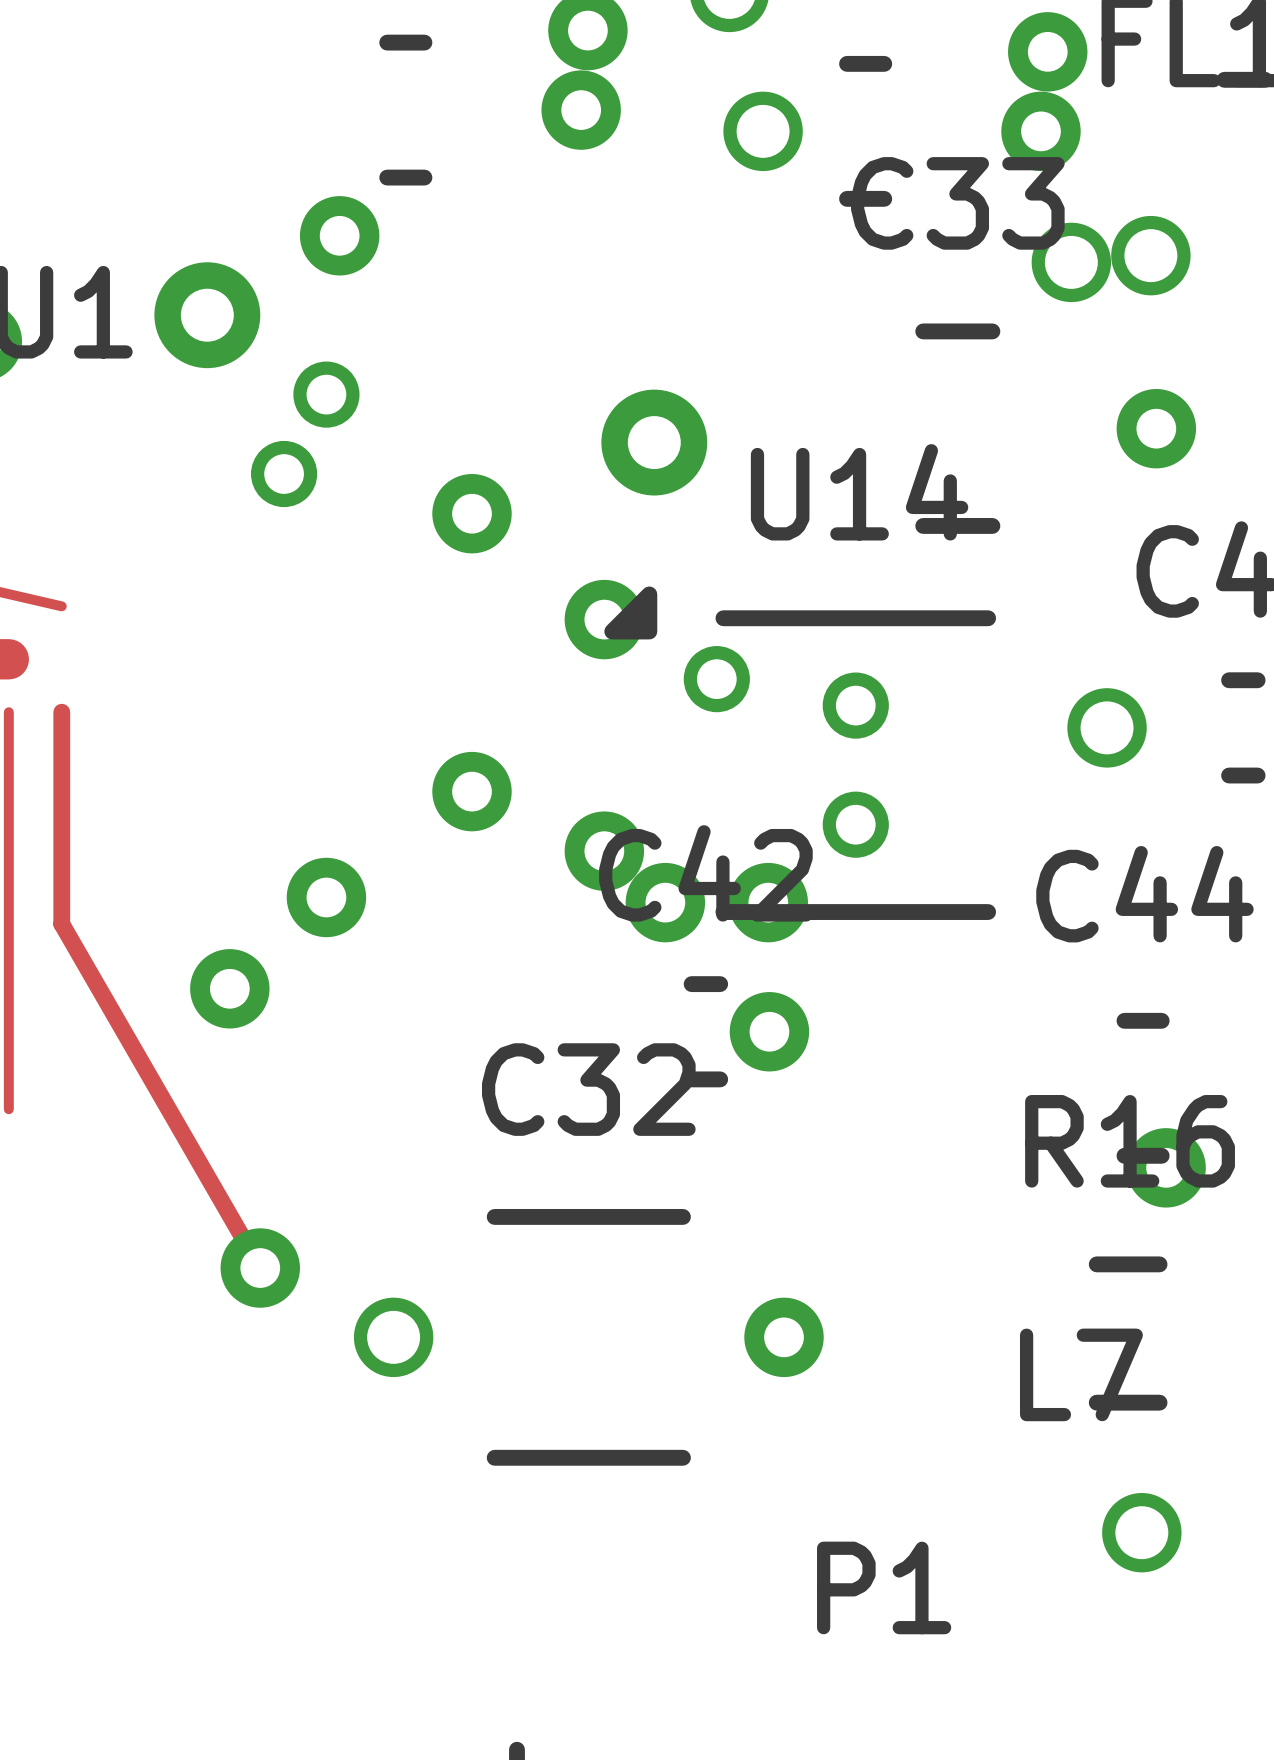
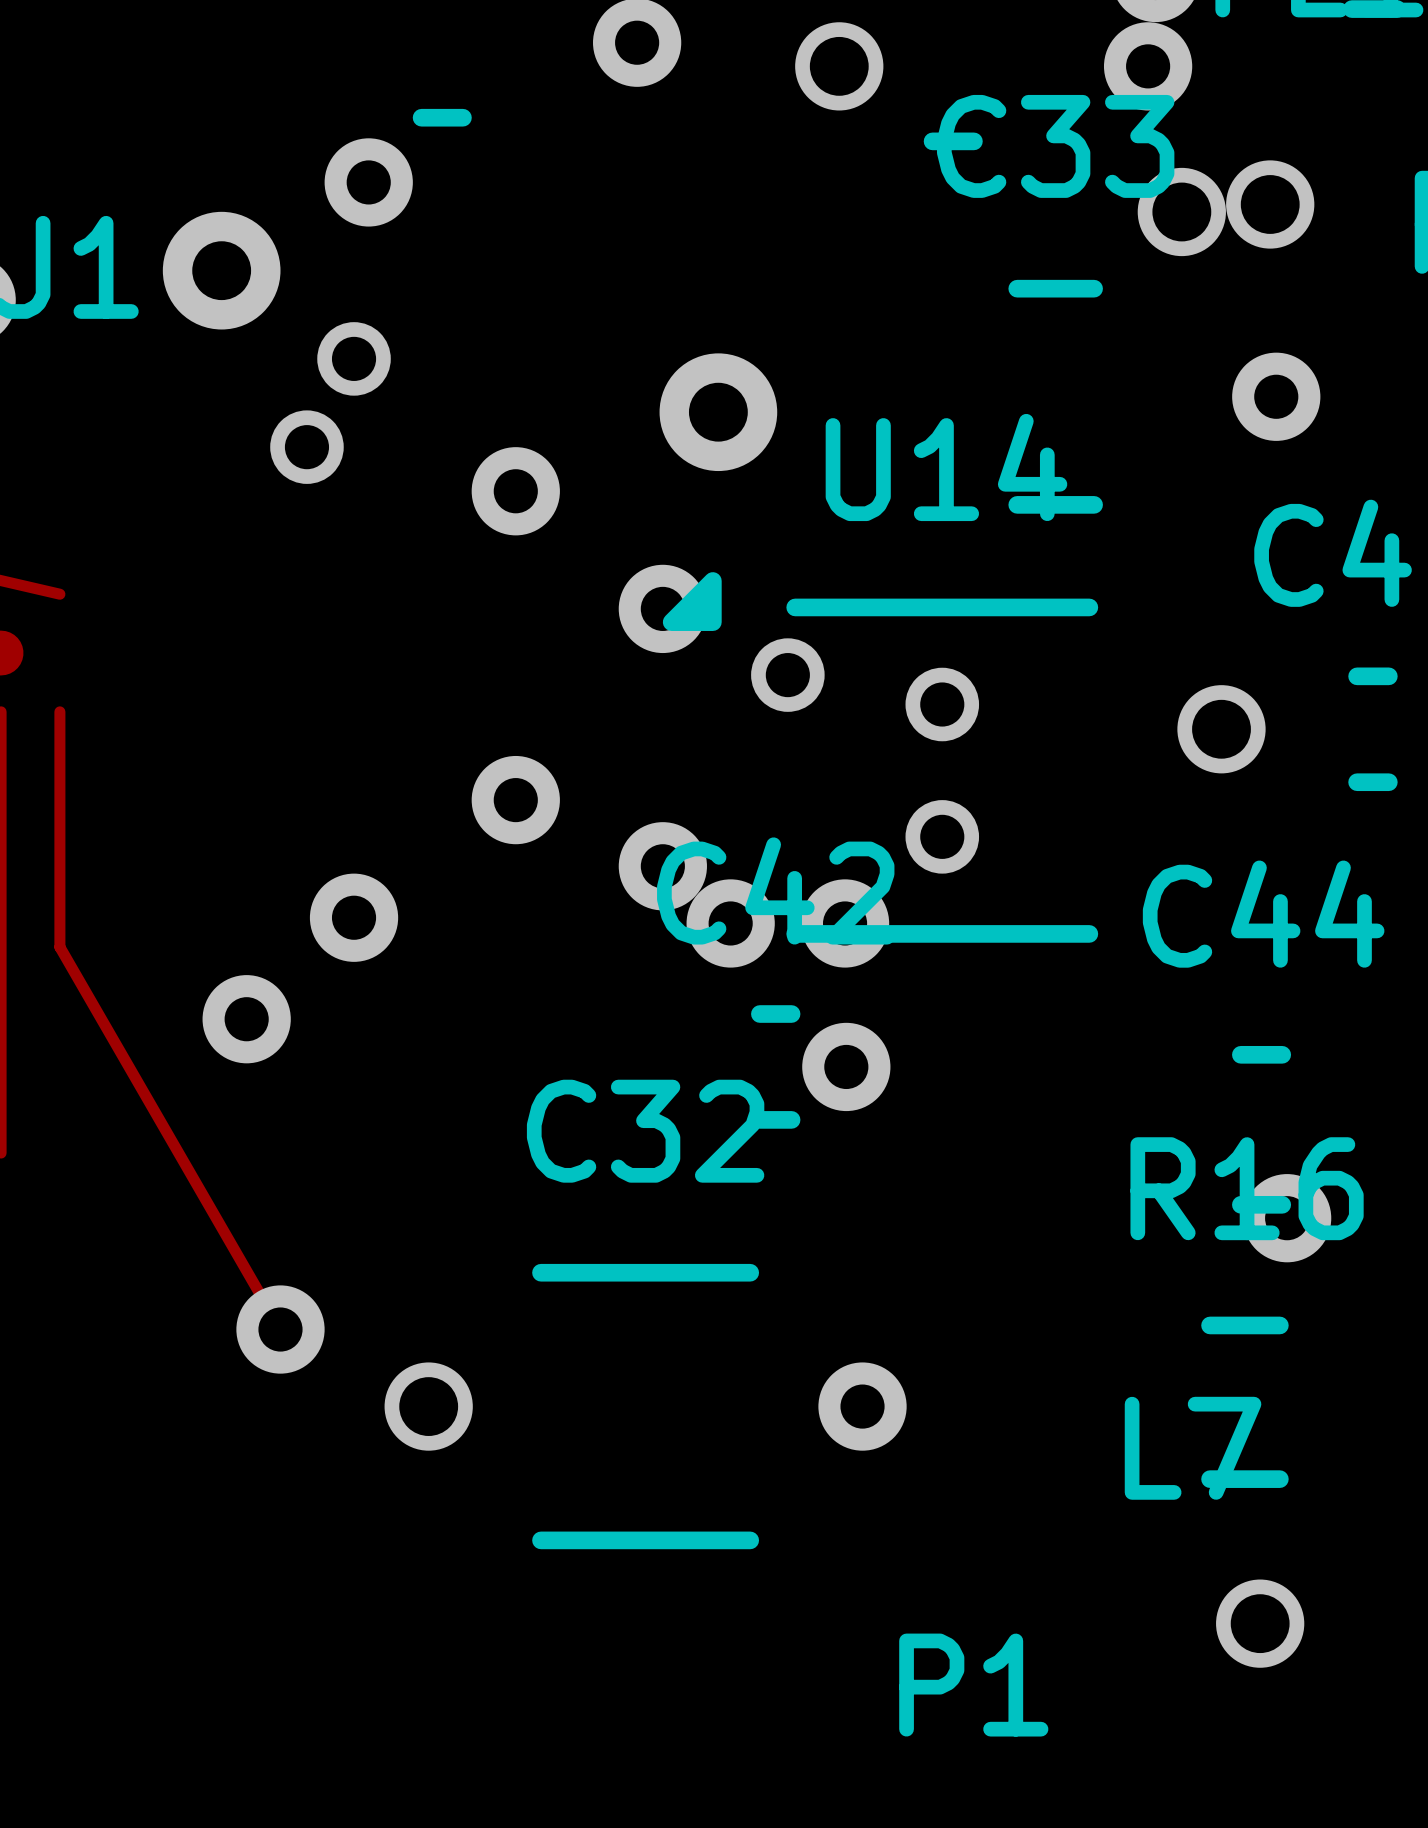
track width: thick (61, 712) (61, 923) (260, 1268) -> thin (59, 711) (59, 947) (280, 1329)

